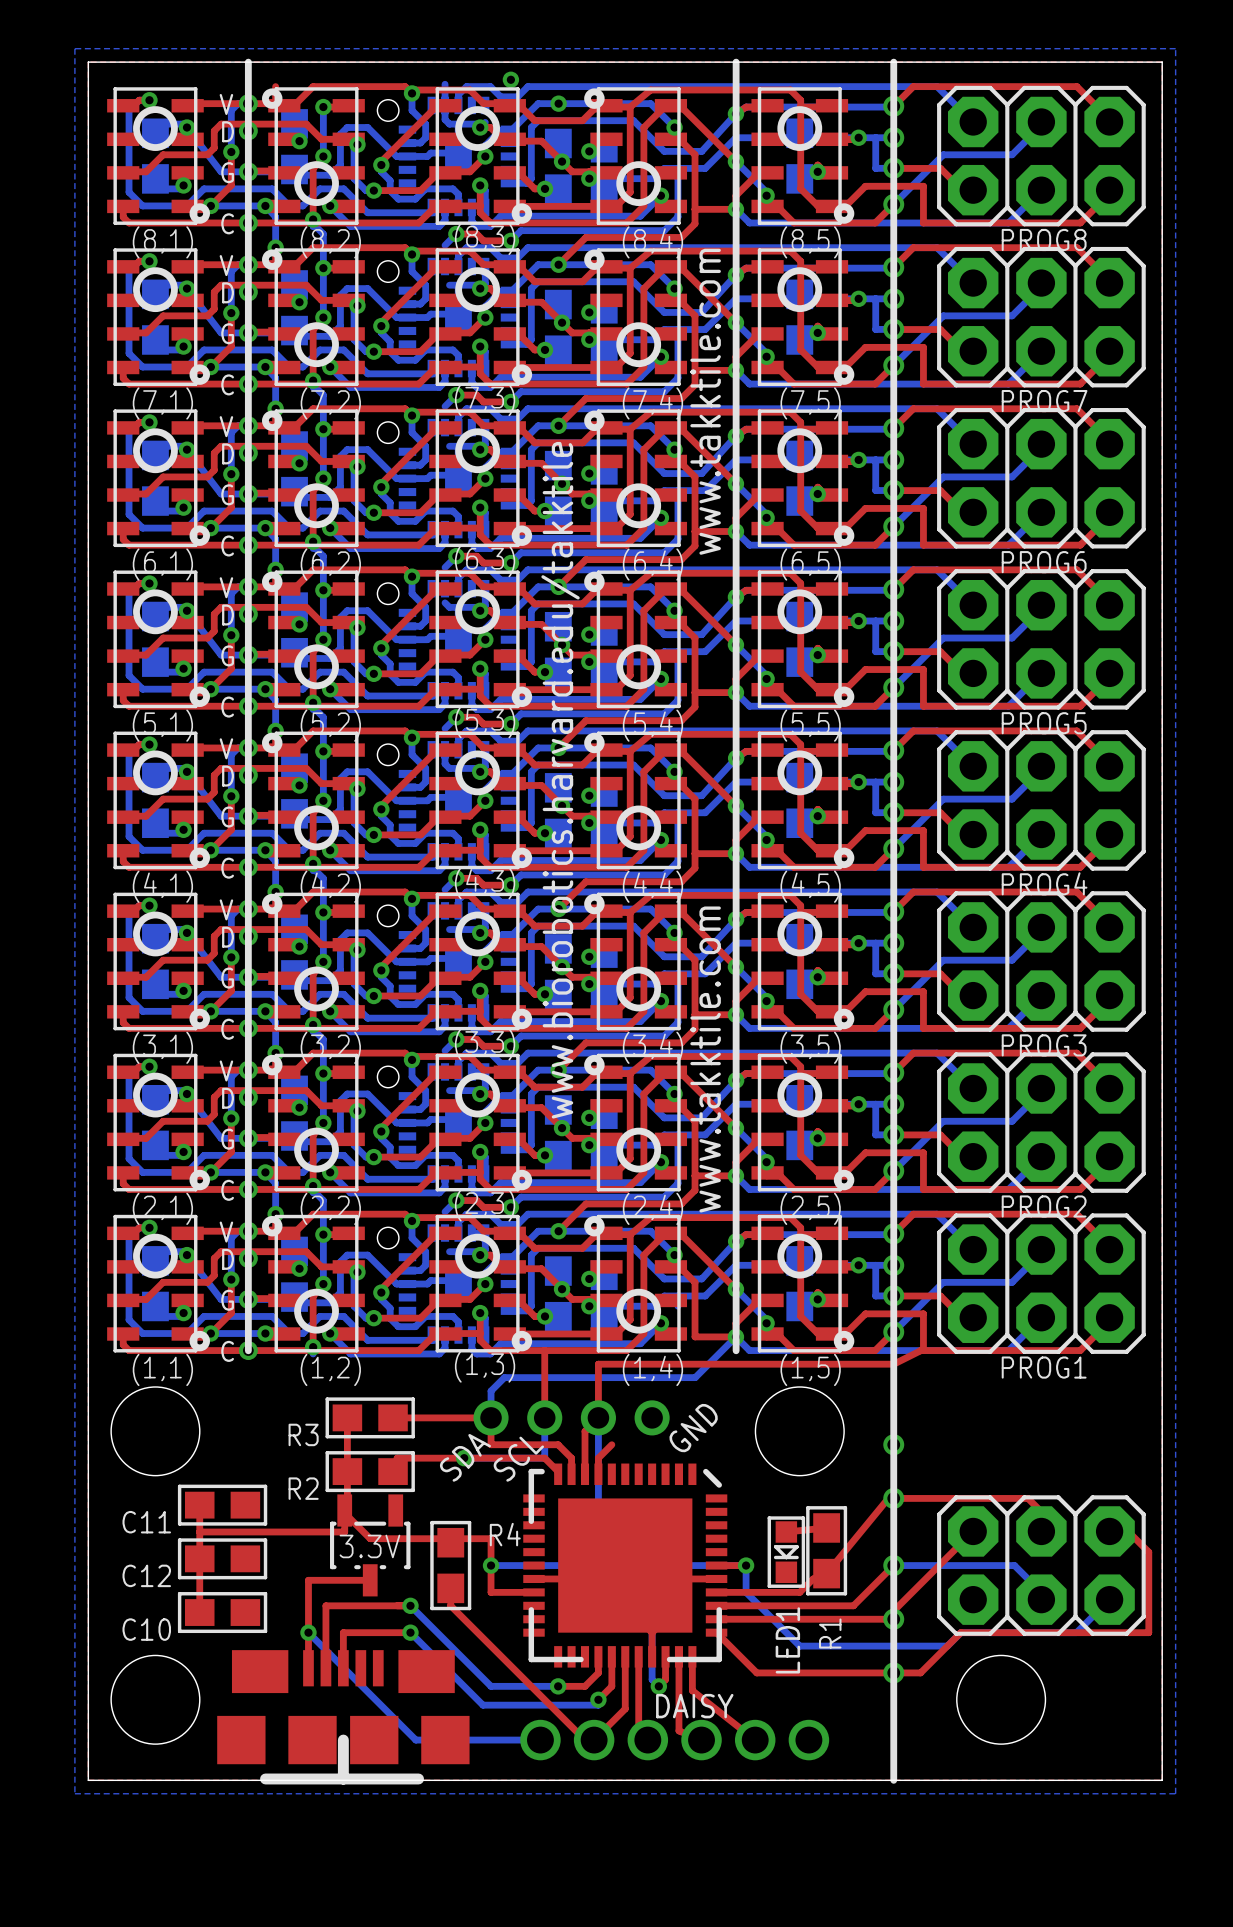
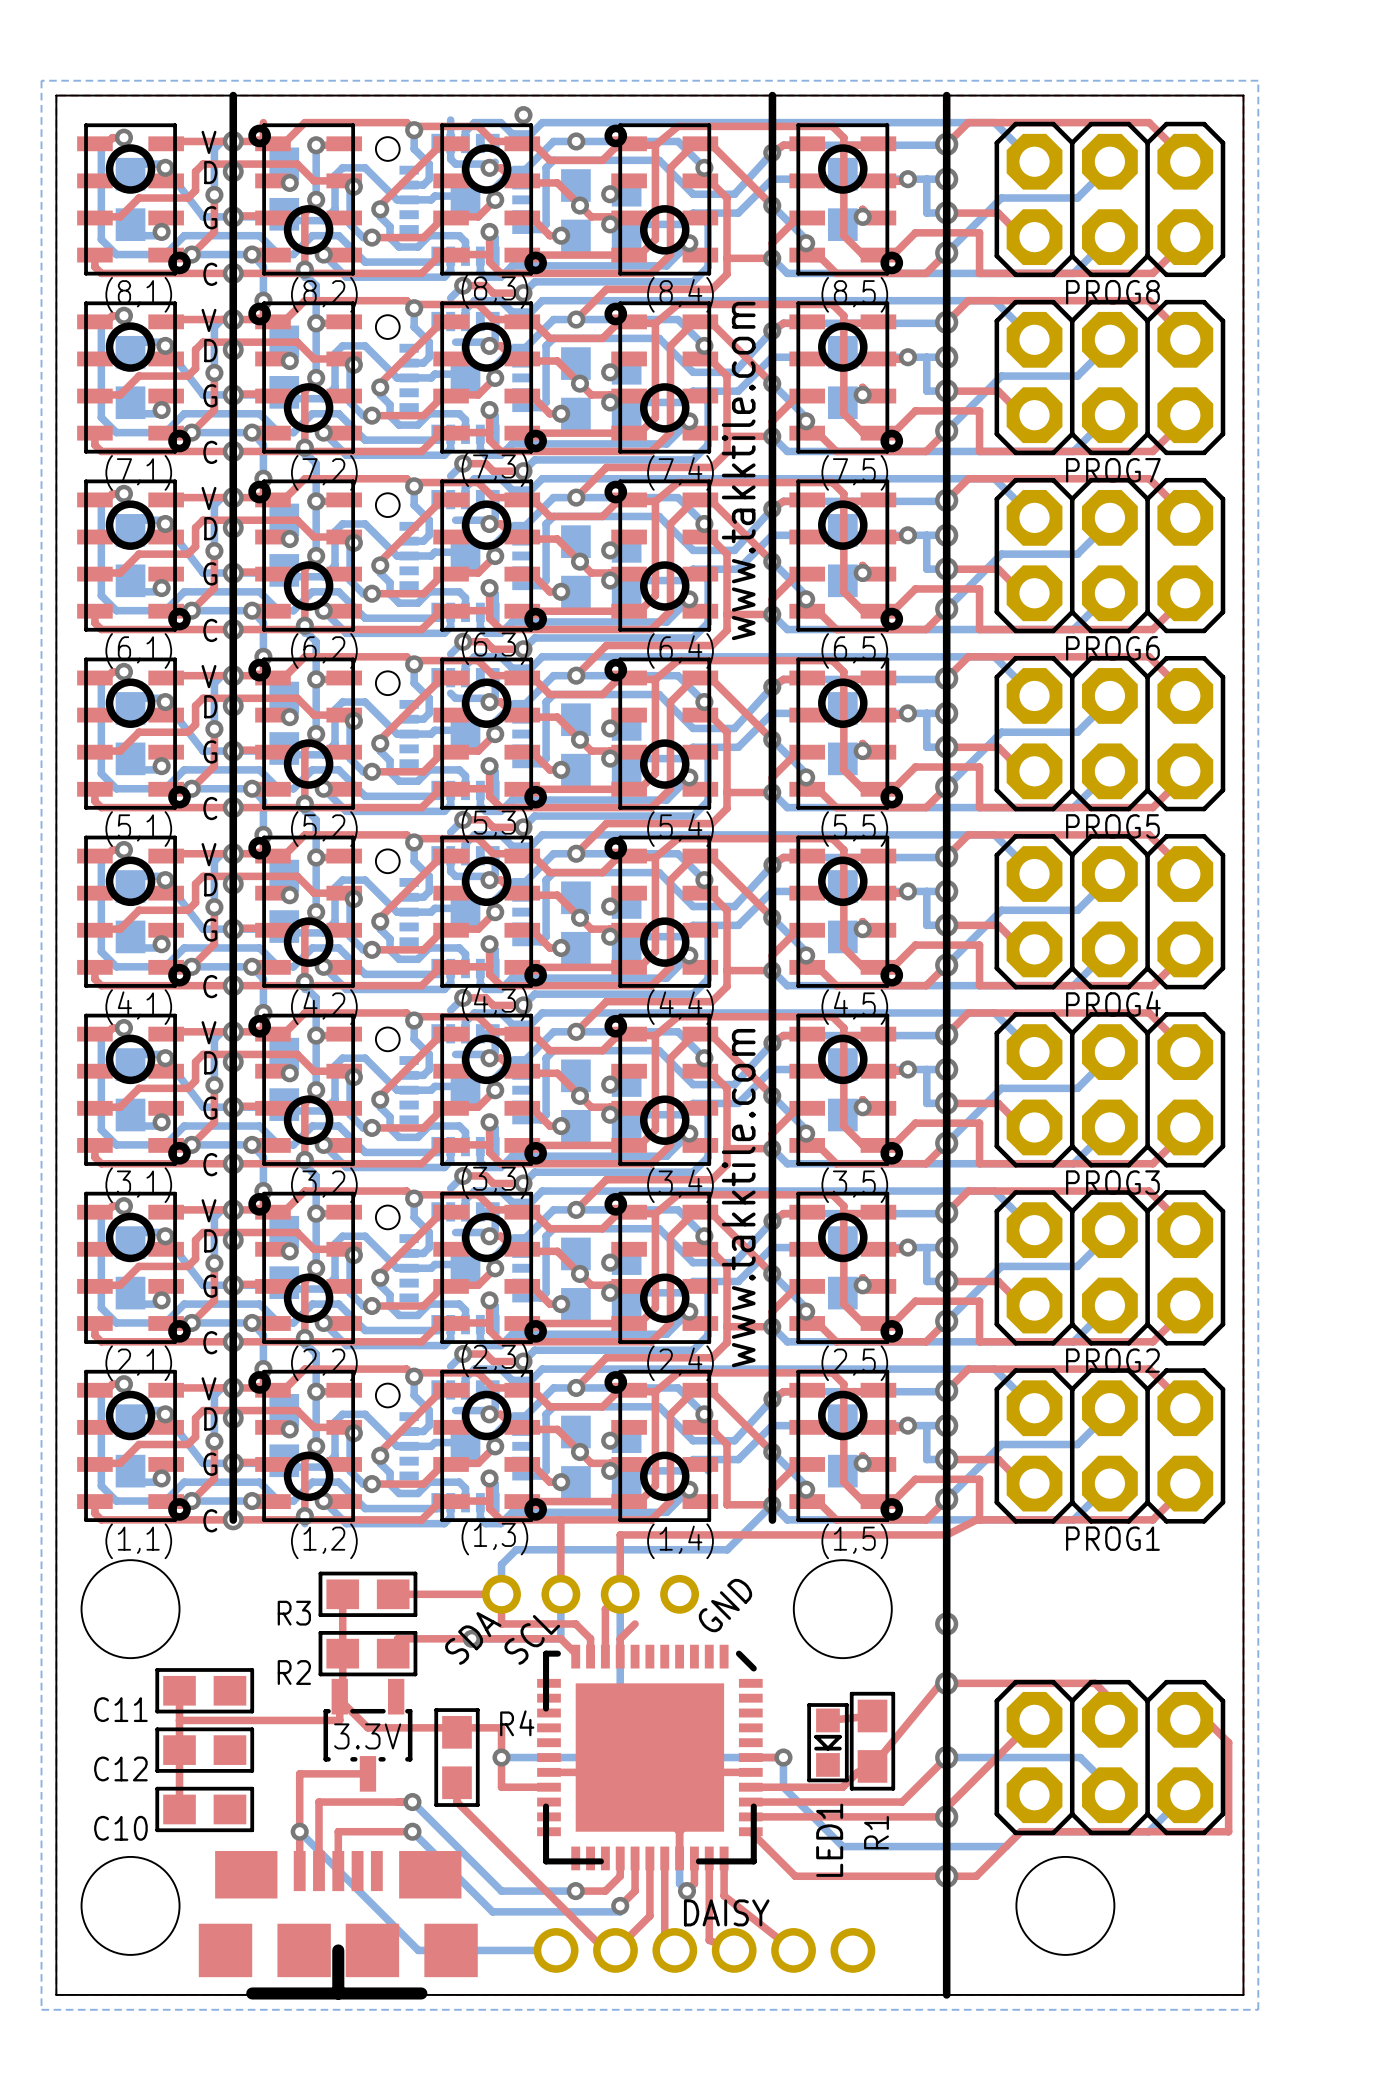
text: www.biorobotics.harvard.edu/takktile (560, 780) -> none

